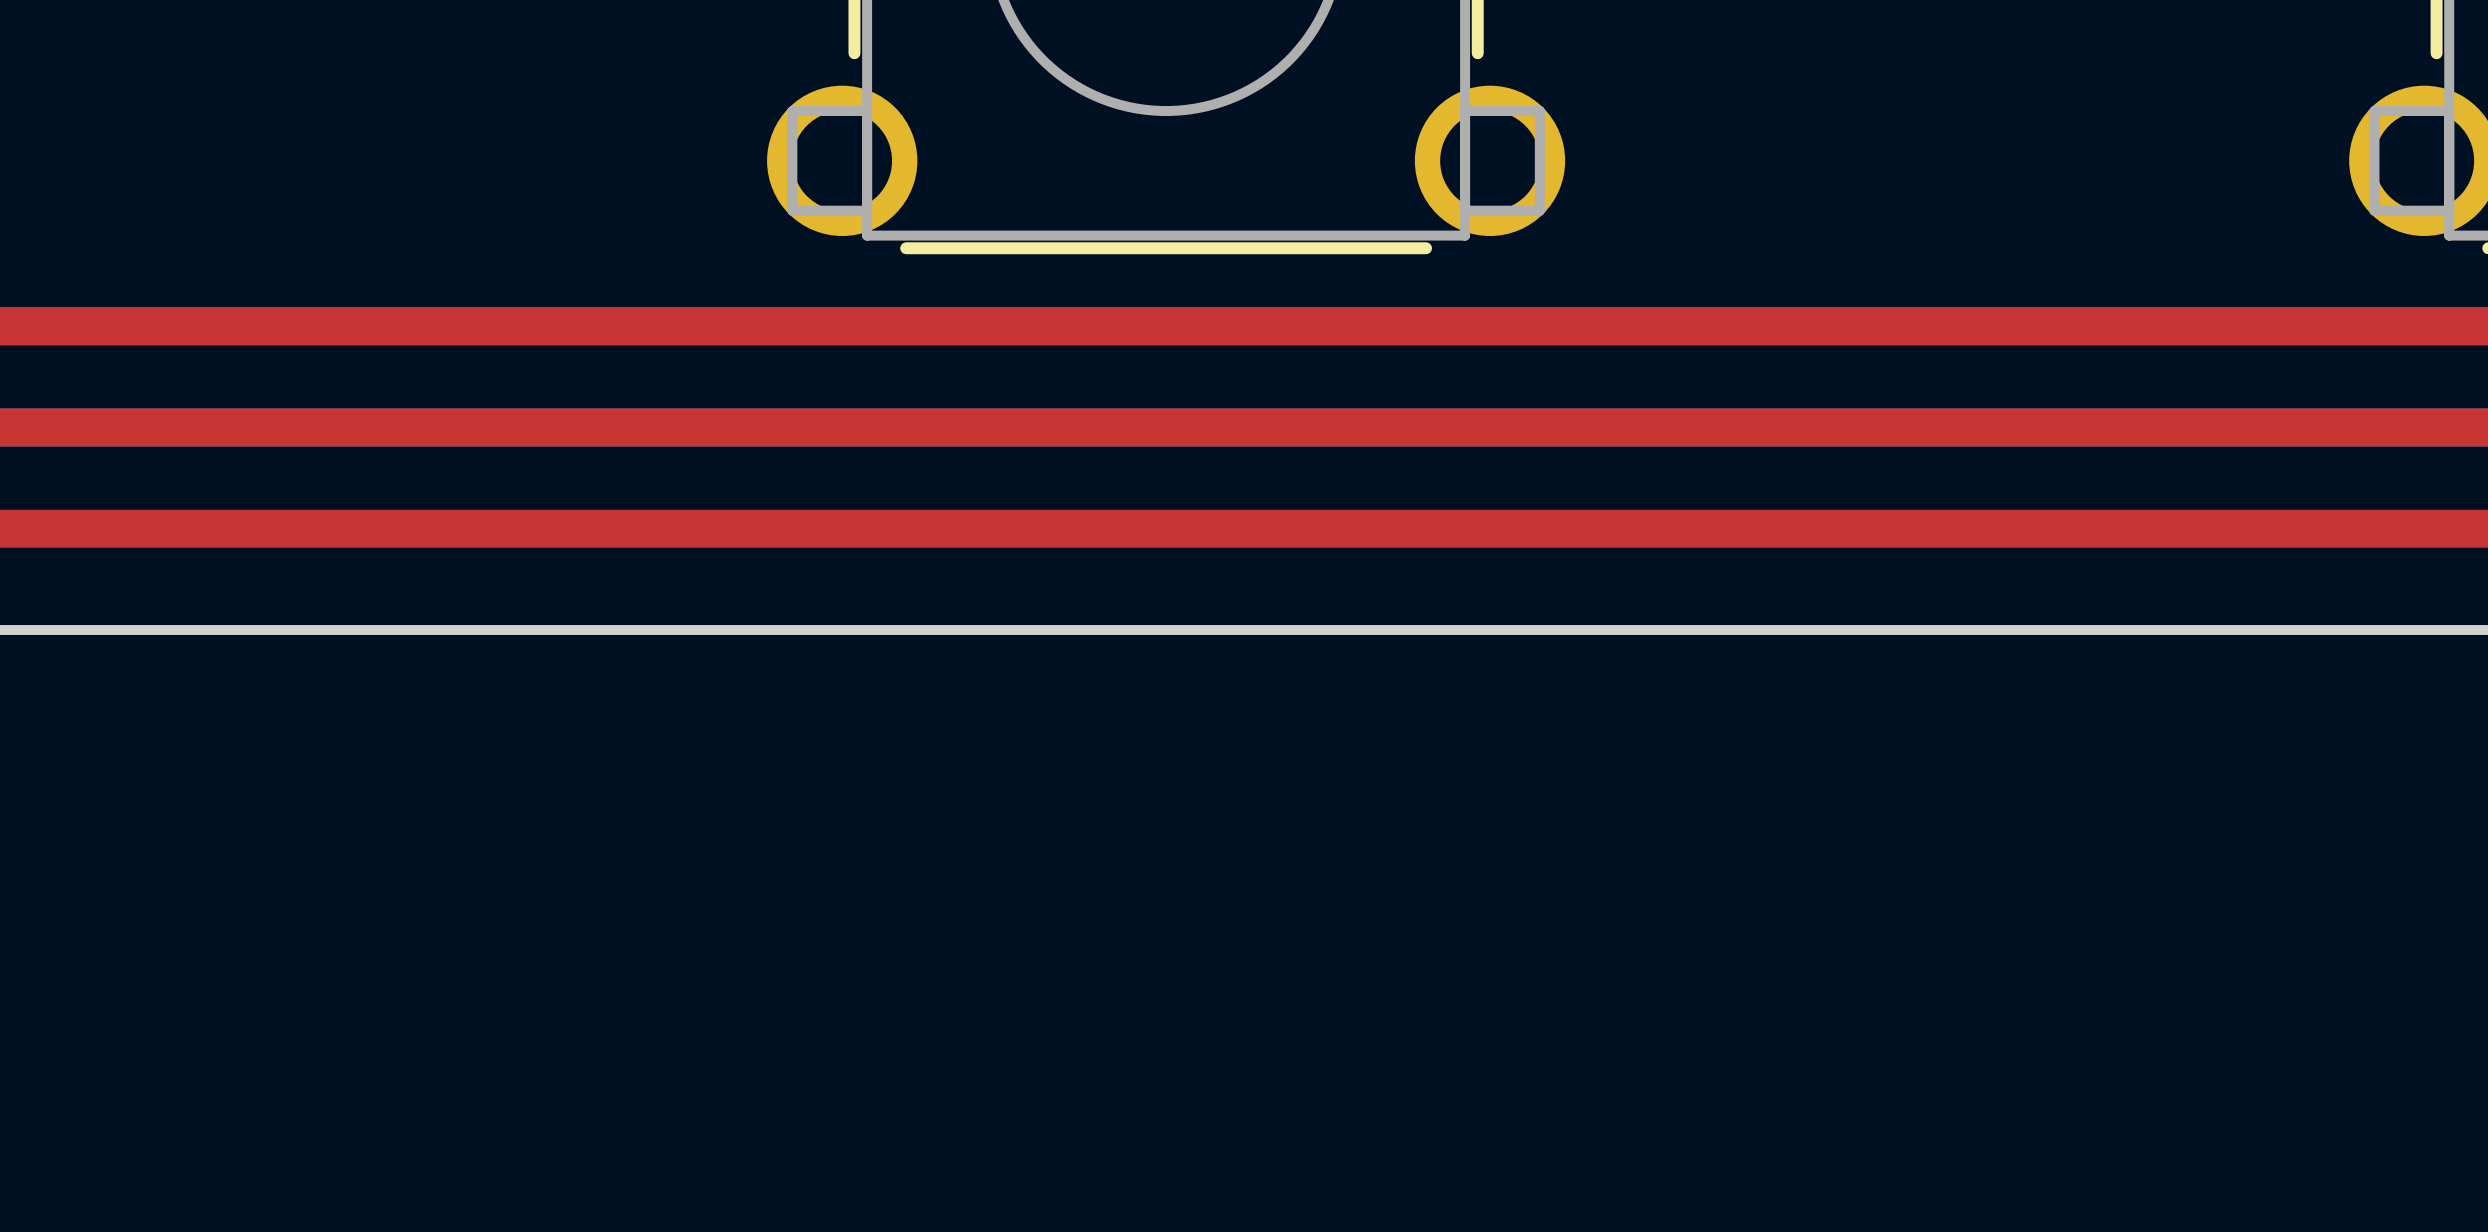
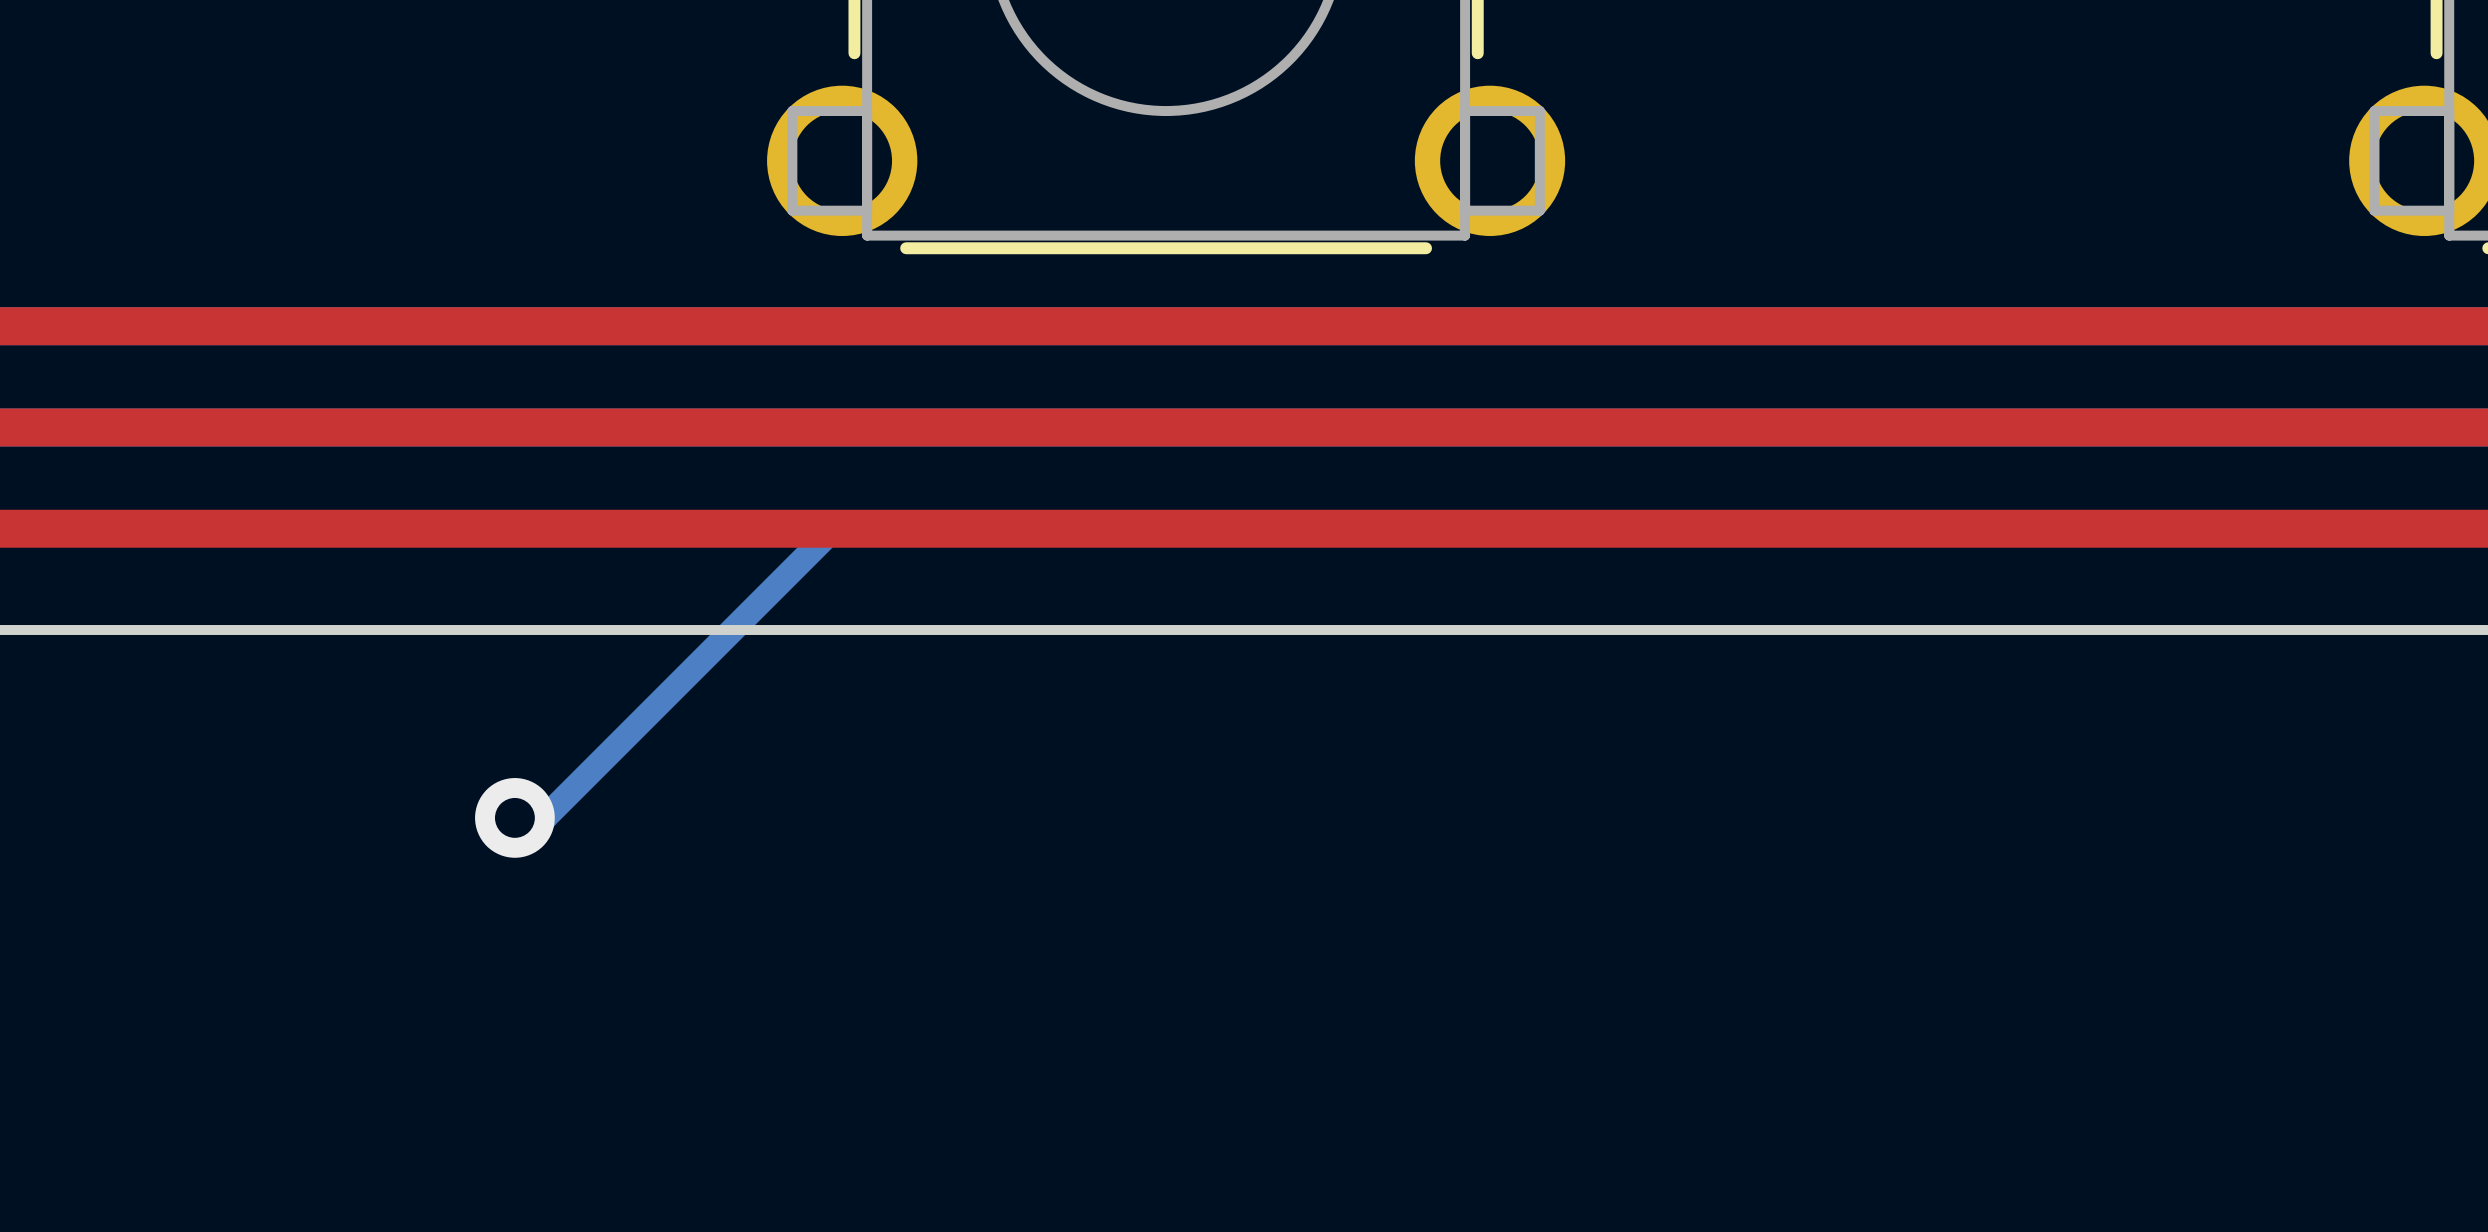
bottom track: none -> (831, 531) (544, 817) (514, 817)
via: none -> (514, 817)

